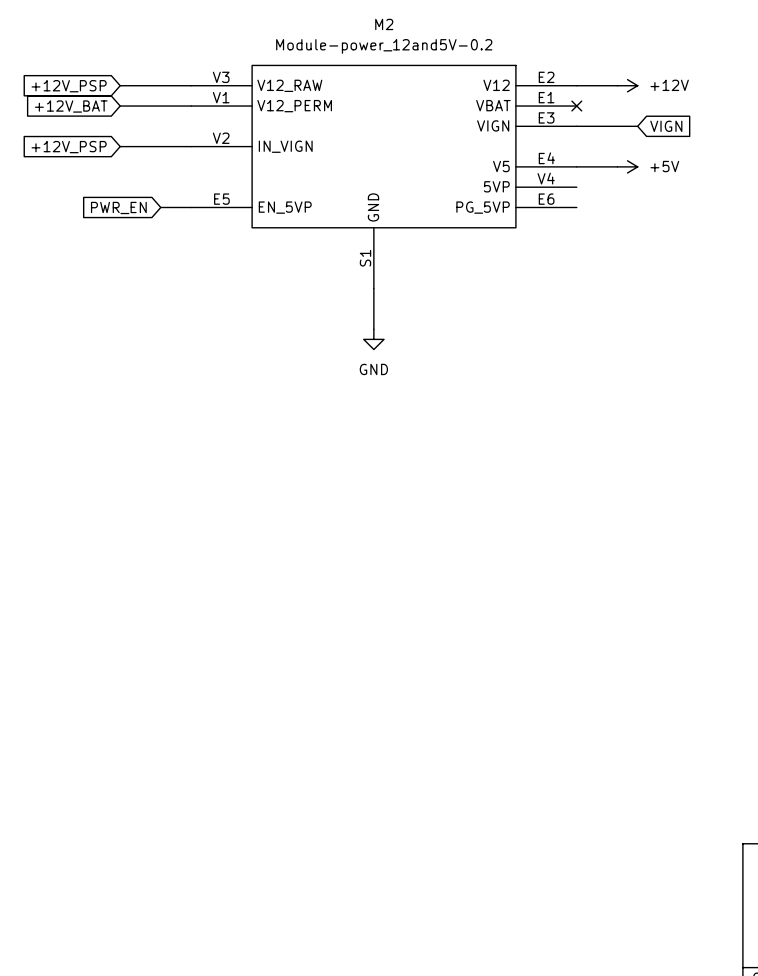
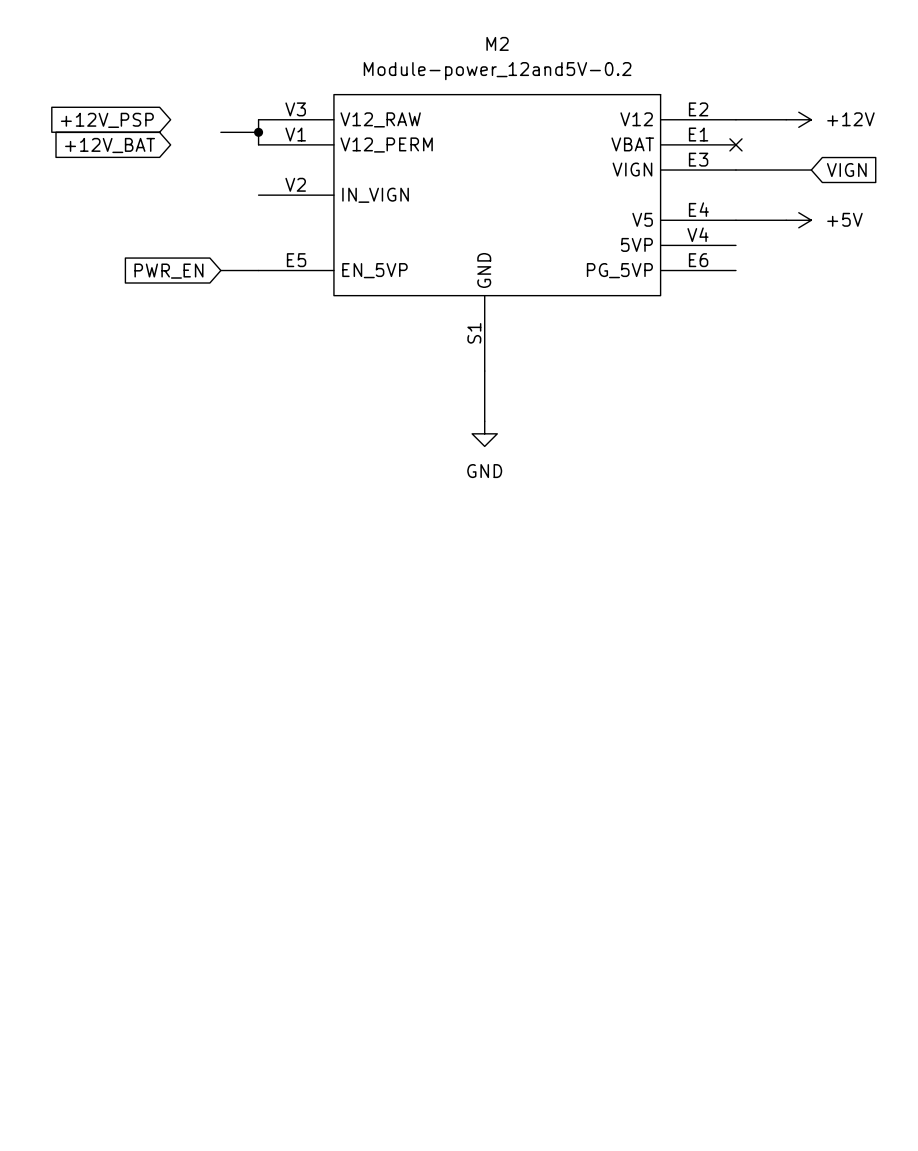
wire: (120, 85) (191, 85) -> (258, 144) (258, 119)
wire: none -> (220, 132) (258, 132)
junction: none -> (258, 132)
wire: (120, 106) (191, 106) -> none
wire: (120, 146) (191, 146) -> none
global label: +12V_PSP (69, 147) -> none

